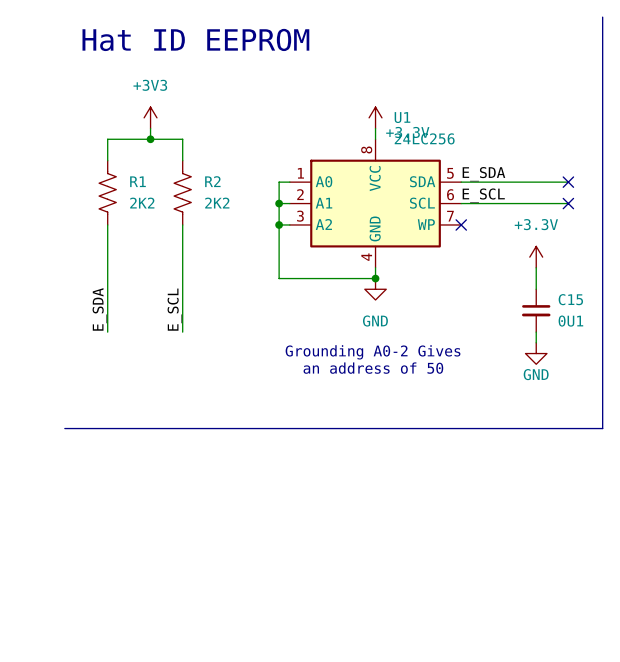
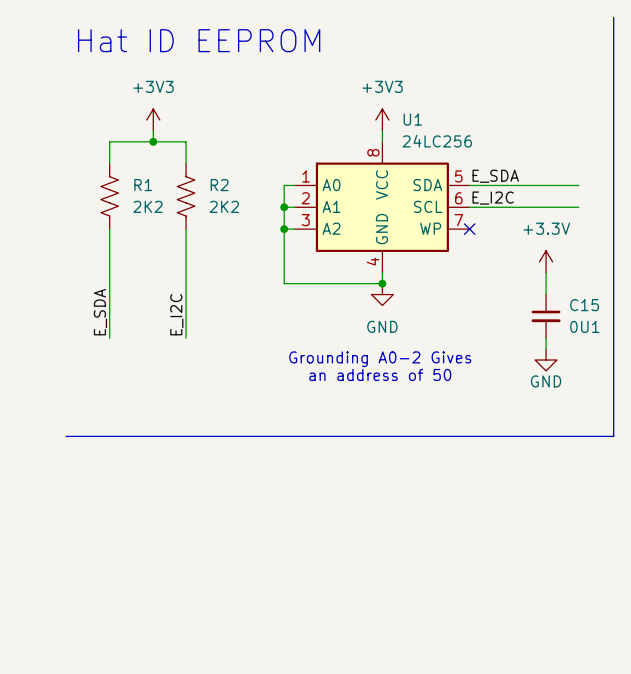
power symbol: +3.3V (375, 117) -> +3V3 (382, 120)
no-connect mark: (568, 182) -> none
label: E_SCL (483, 195) -> E_I2C (493, 198)
no-connect mark: (568, 203) -> none
label: E_SCL (174, 309) -> E_I2C (176, 314)

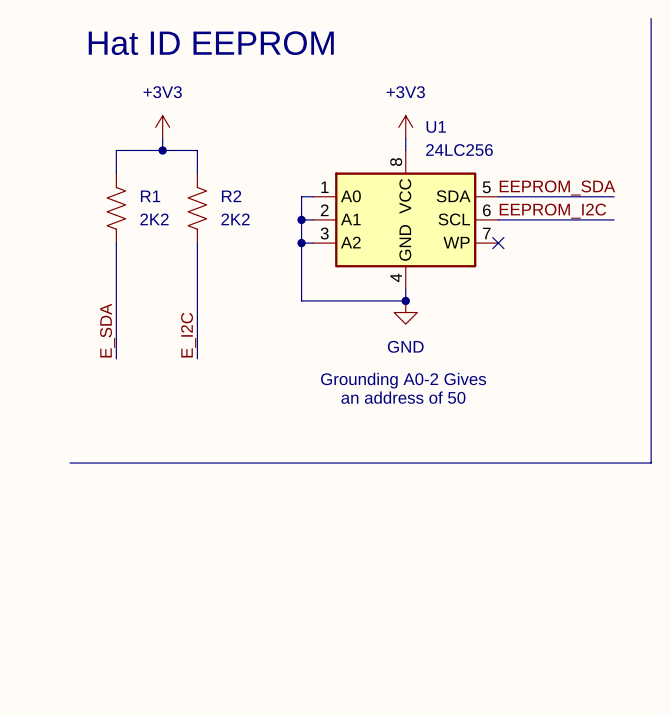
label: E_SDA (495, 176) -> EEPROM_SDA (557, 188)
label: E_I2C (493, 198) -> EEPROM_I2C (552, 211)
power symbol: +3.3V (546, 261) -> none
wire: (546, 272) (546, 294) -> none
C15: 0U1 (546, 316) -> none
wire: (546, 338) (546, 349) -> none
power symbol: GND (546, 360) -> none

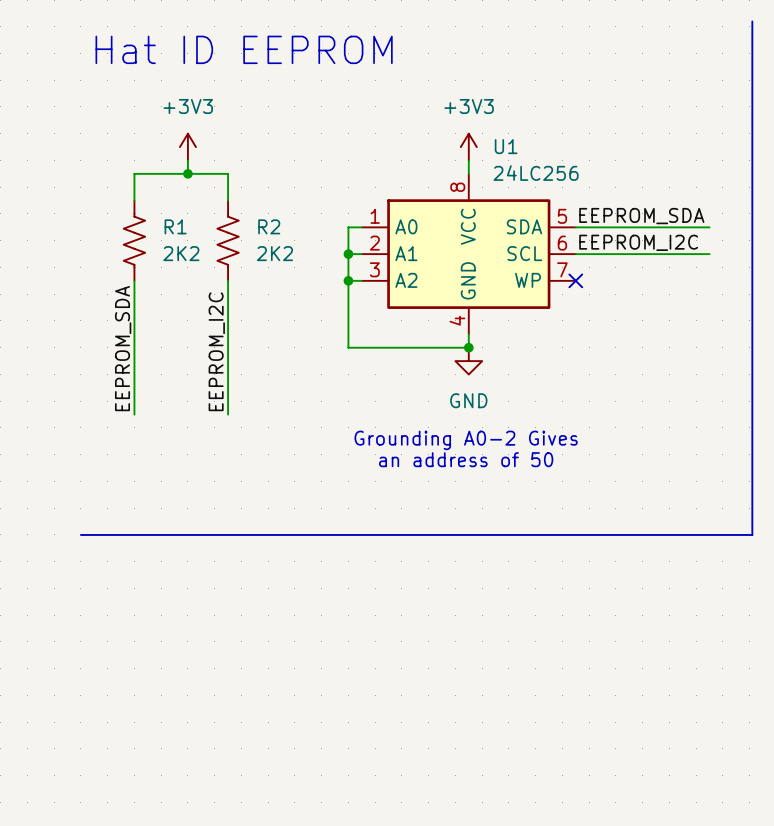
label: E_SDA (107, 330) -> EEPROM_SDA (123, 348)
label: E_I2C (188, 335) -> EEPROM_I2C (216, 351)

